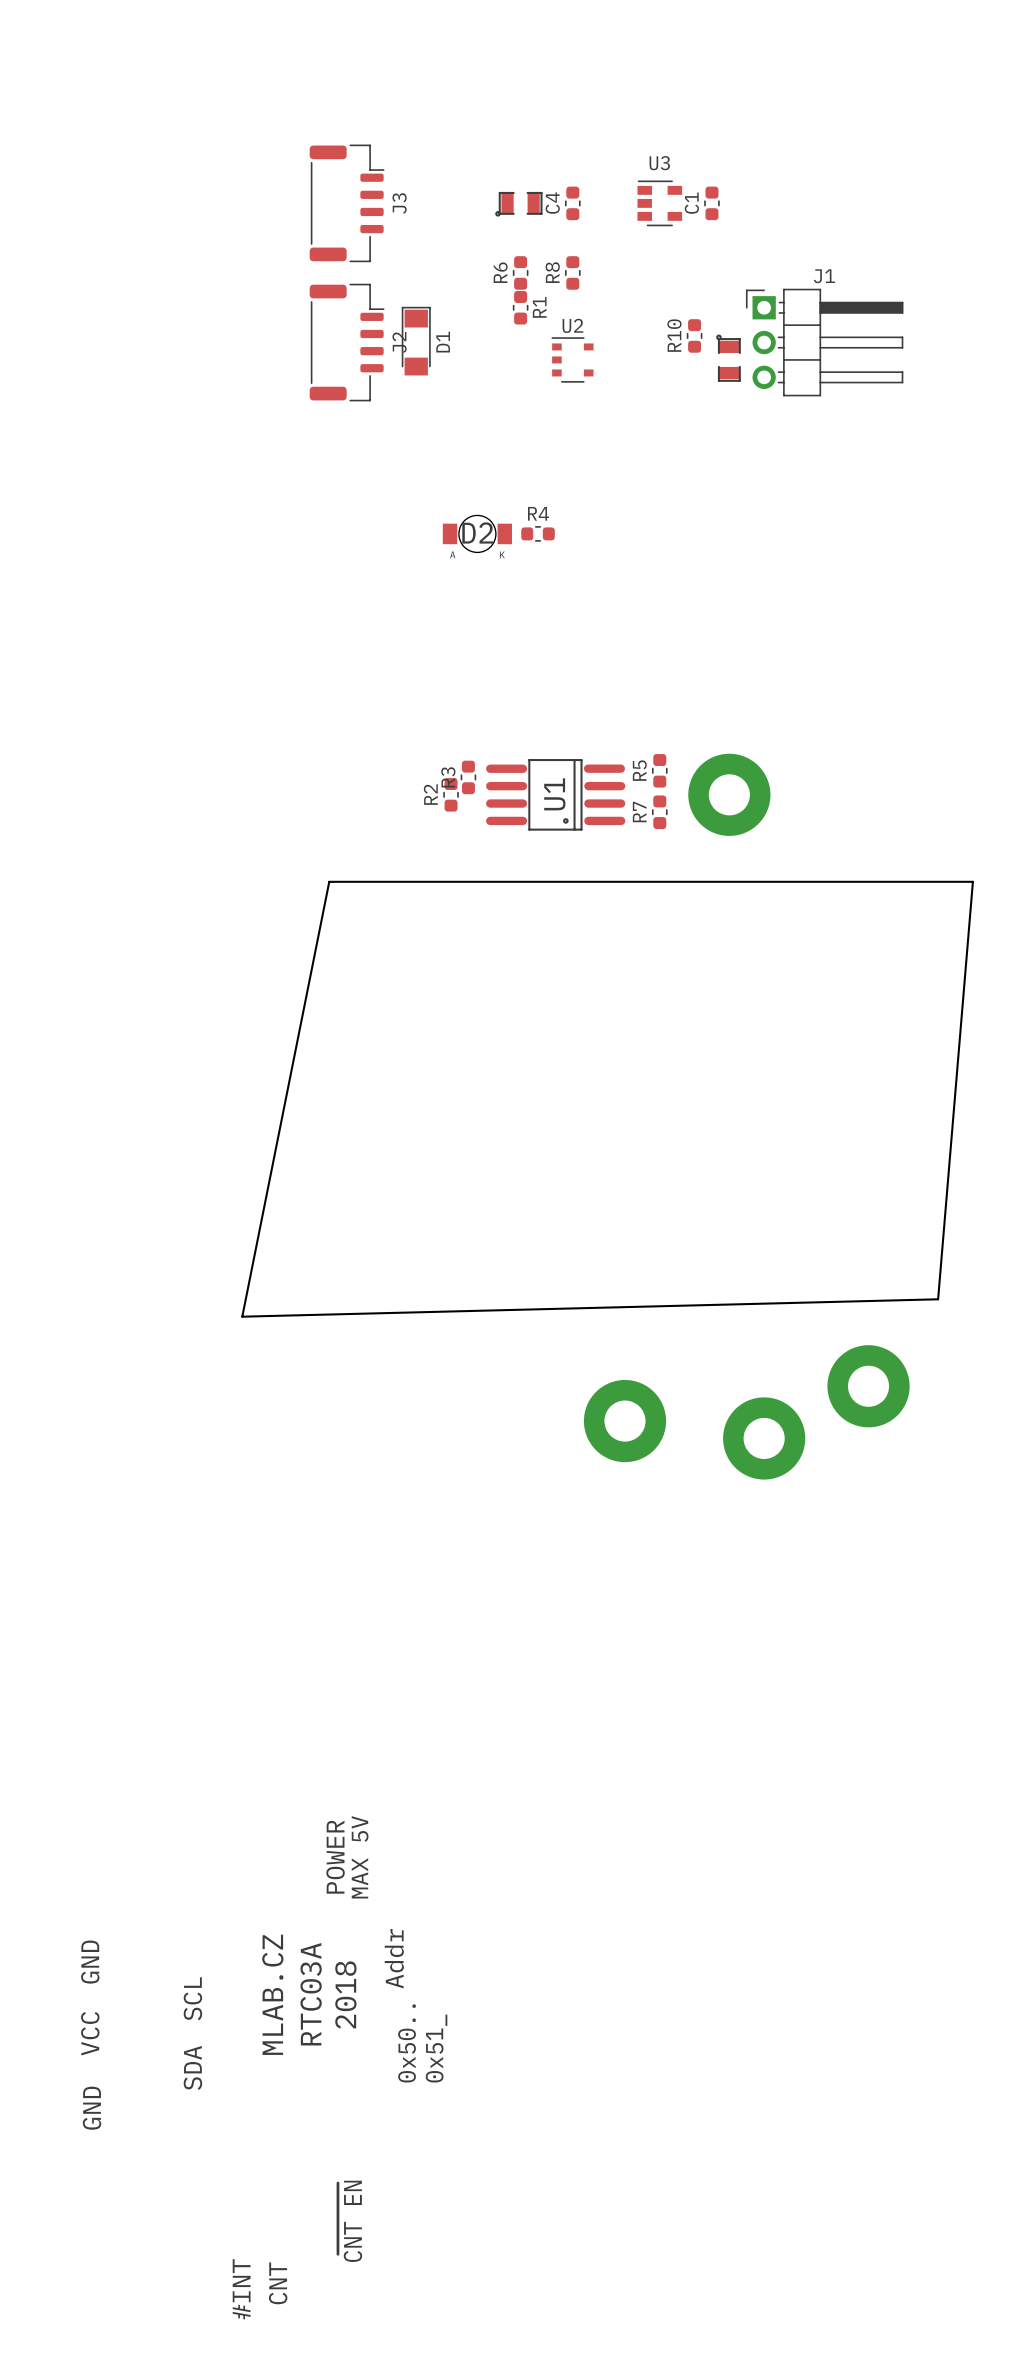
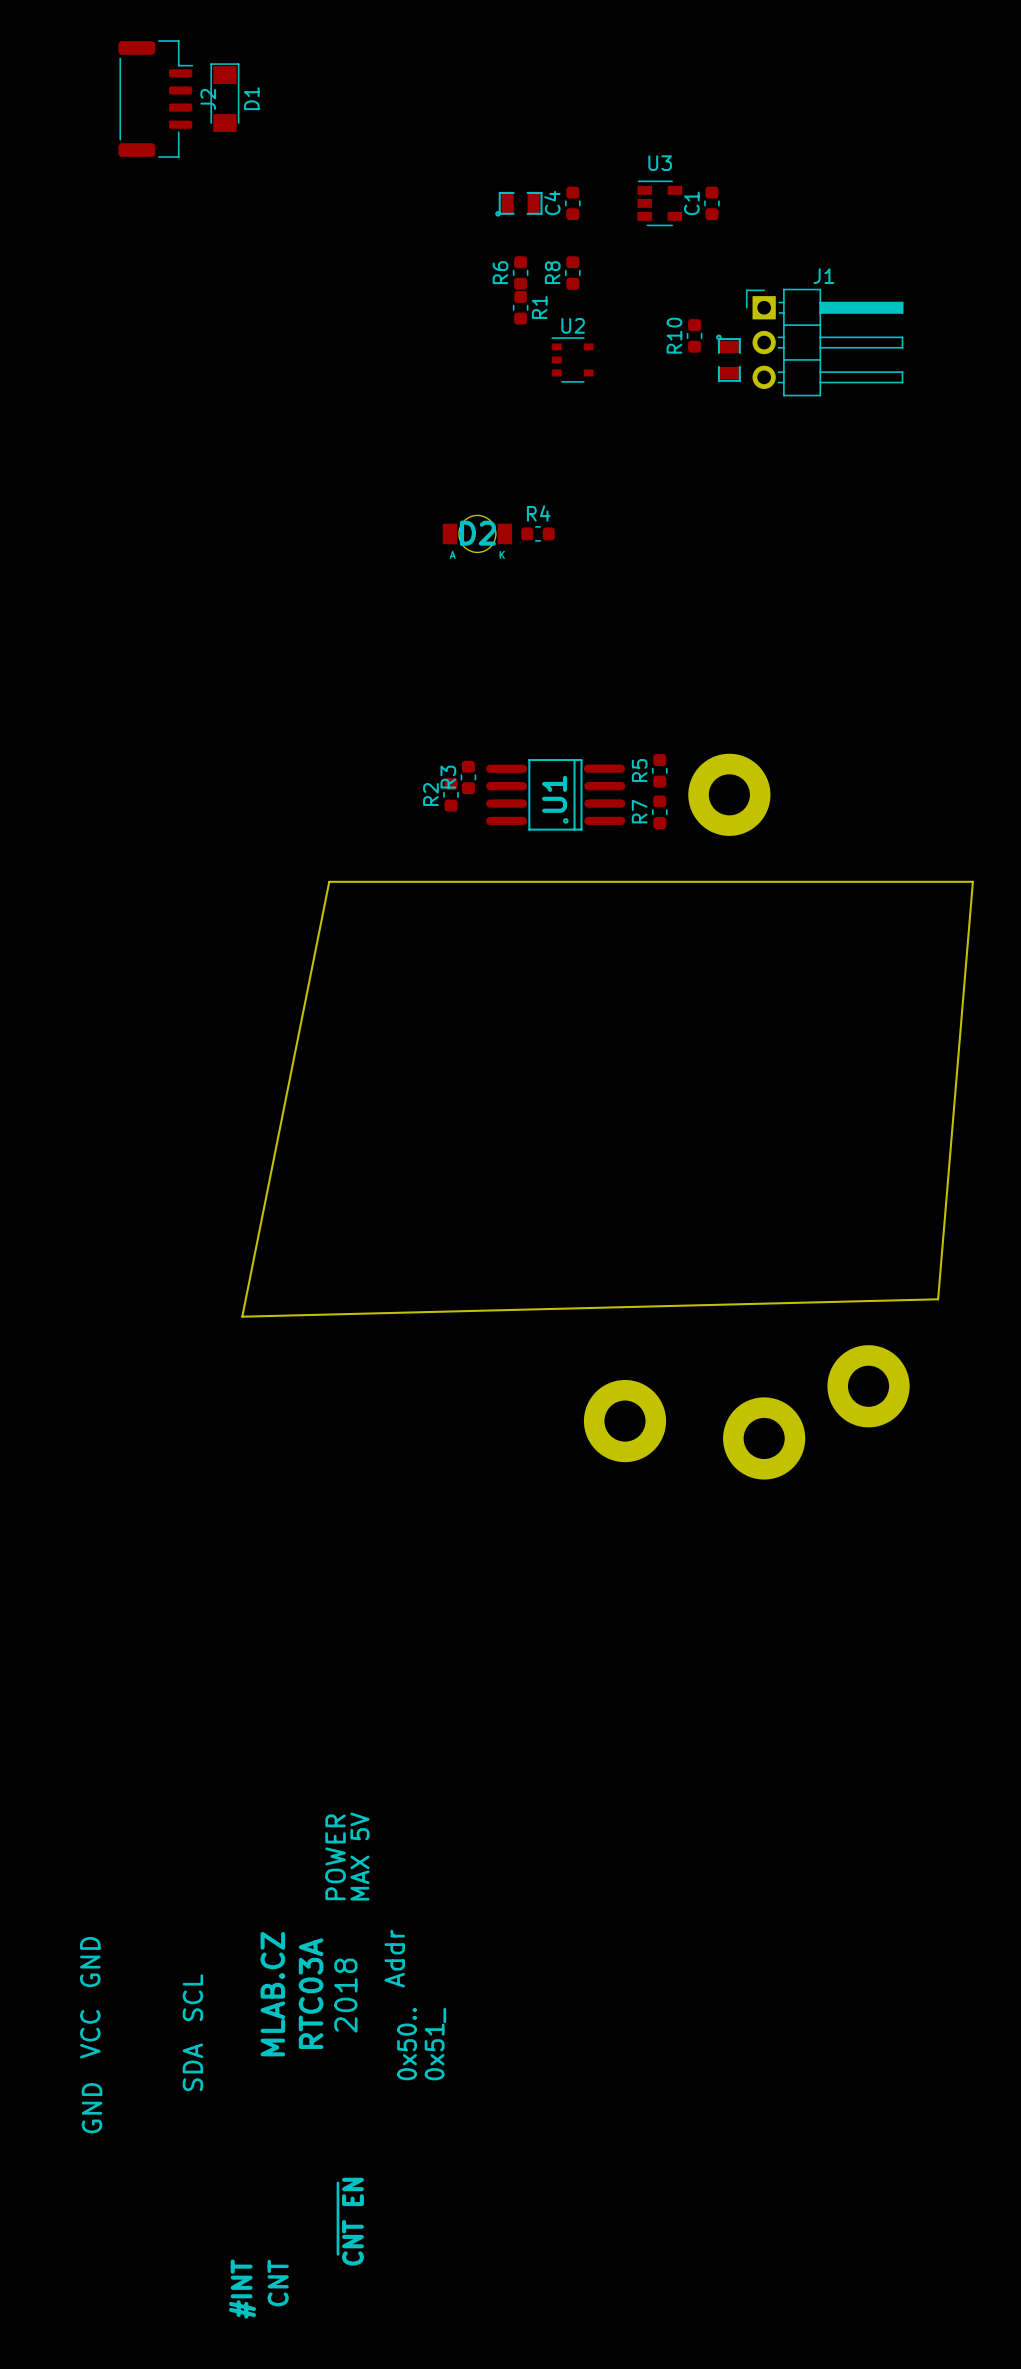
J3: (347, 203) -> none
D1 position: (416, 341) -> (224, 97)
J2 position: (347, 342) -> (155, 99)

